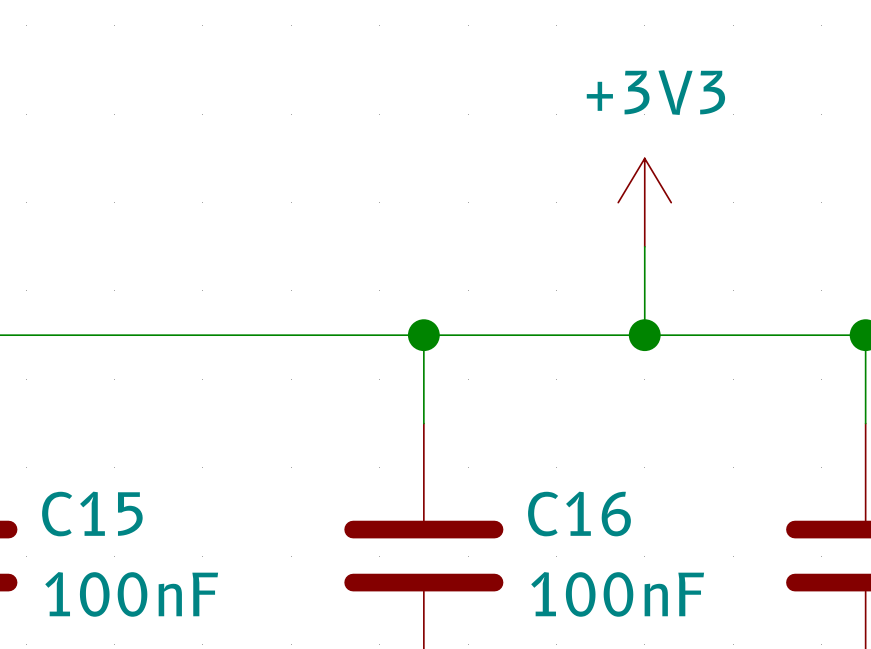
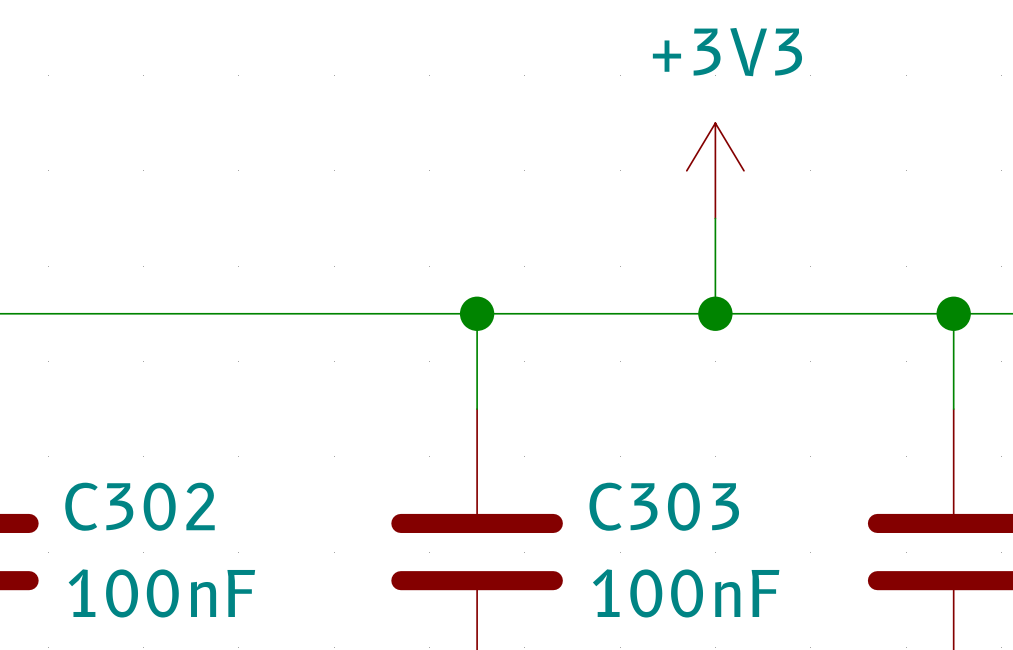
C15 name: C15 (92, 514) -> C302 (140, 506)
C16 name: C16 (579, 514) -> C303 (664, 506)

